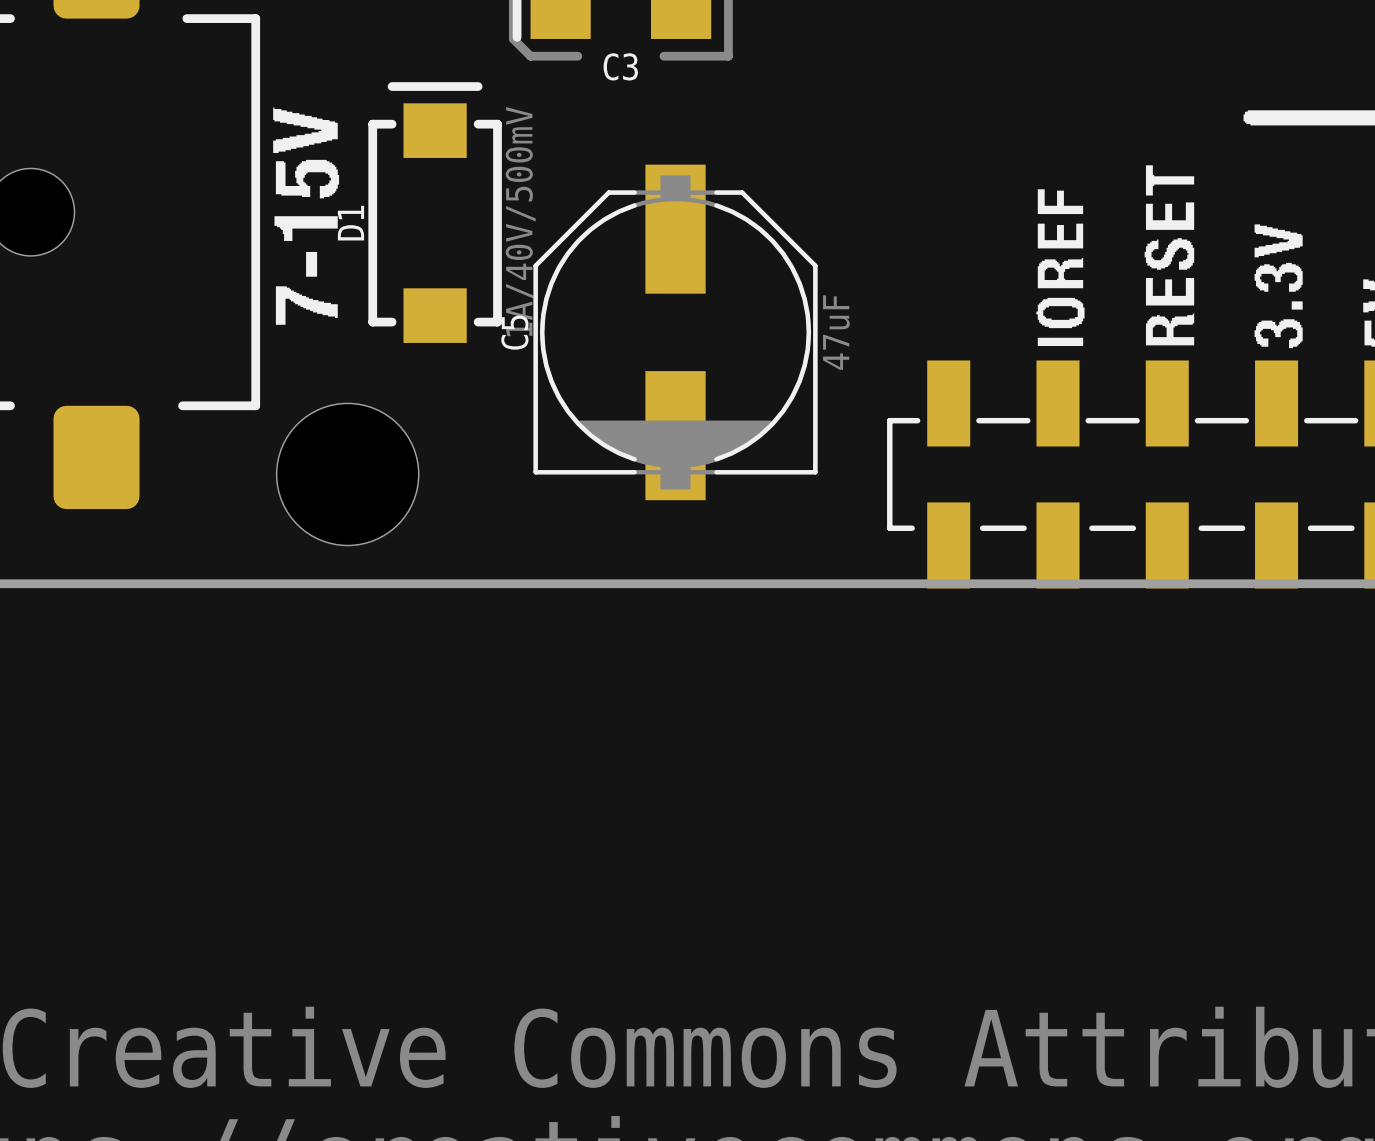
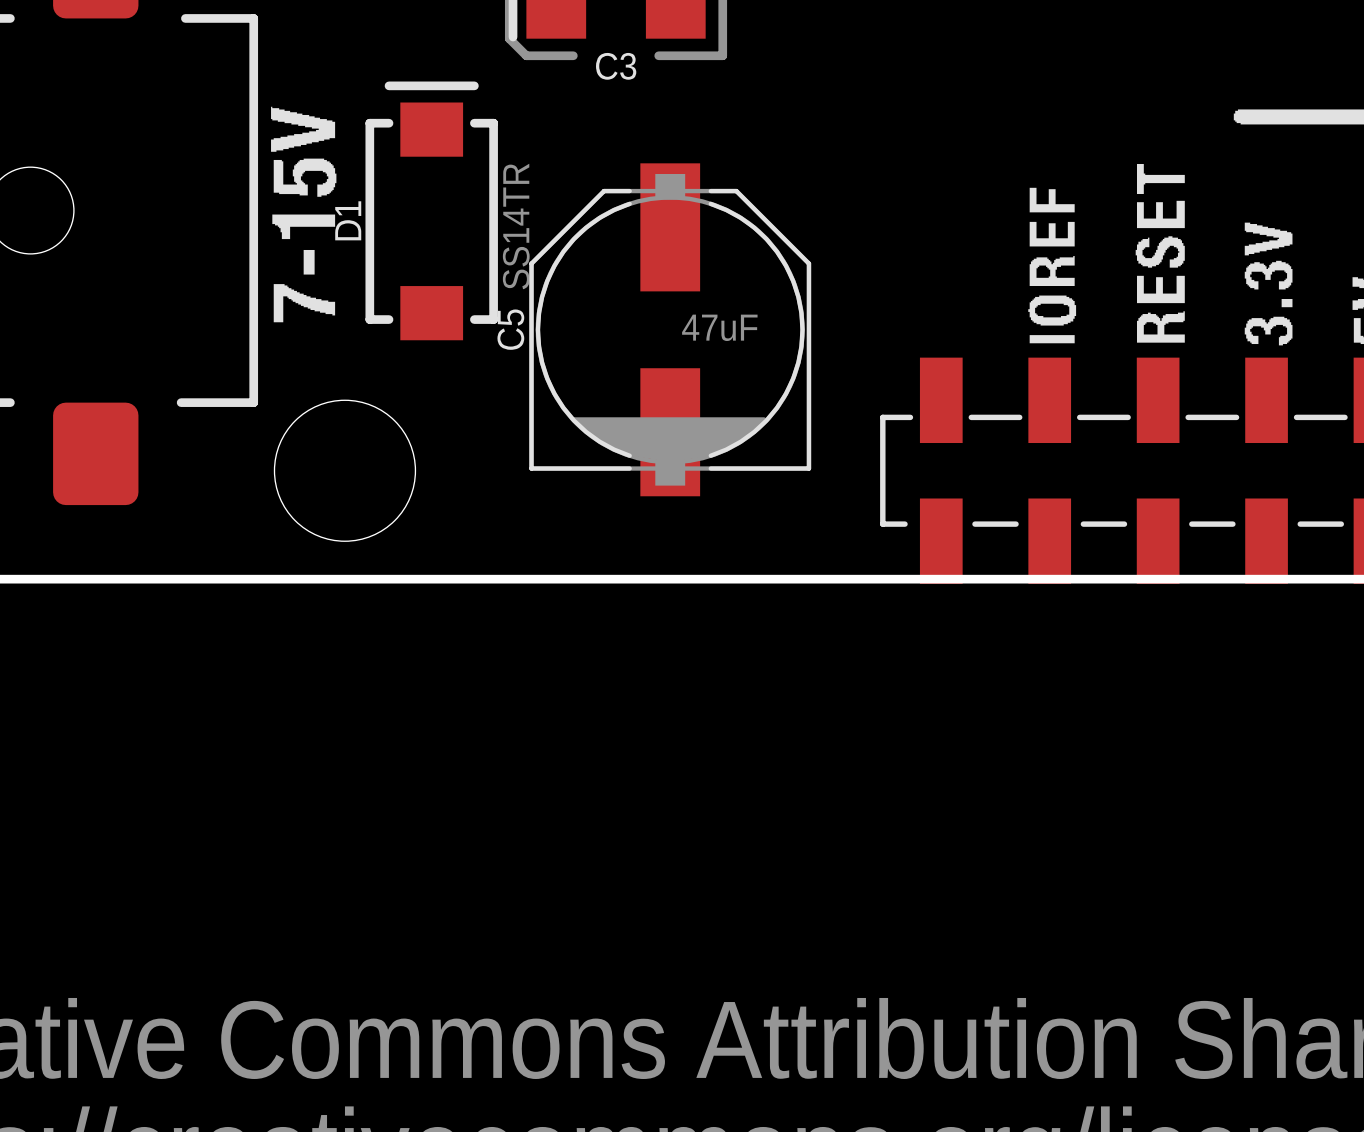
D1 value: 1A/40V/500mV (520, 221) -> none
text: none -> SS14TR (516, 226)
C5 value rotation: 0° (836, 332) -> 90° clockwise (719, 327)
C5 value position: 47uF (836, 332) -> 47uF (719, 327)

